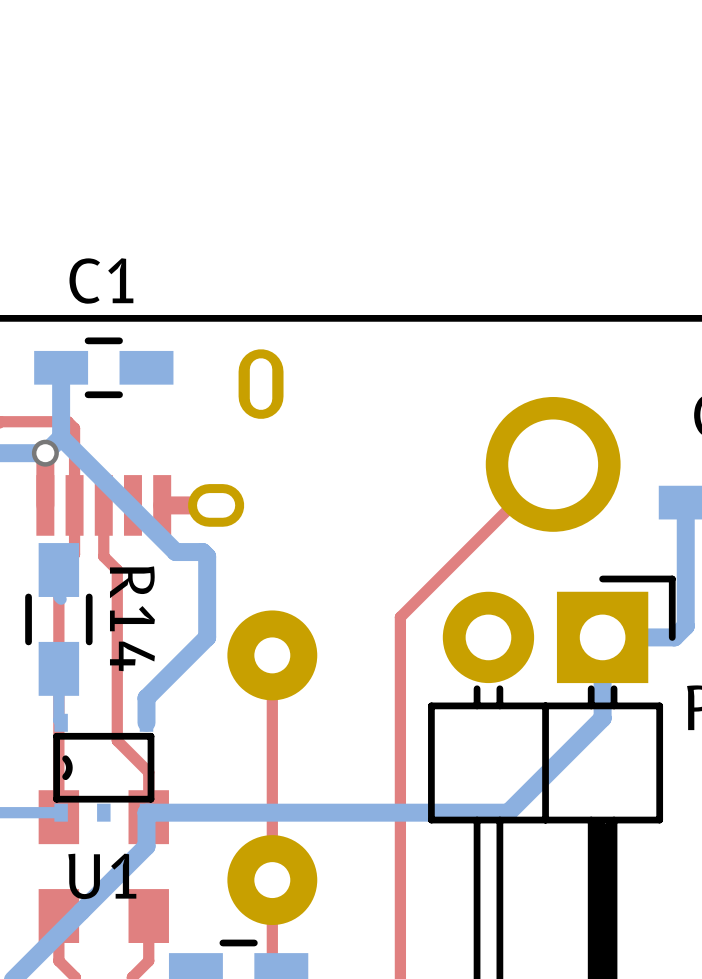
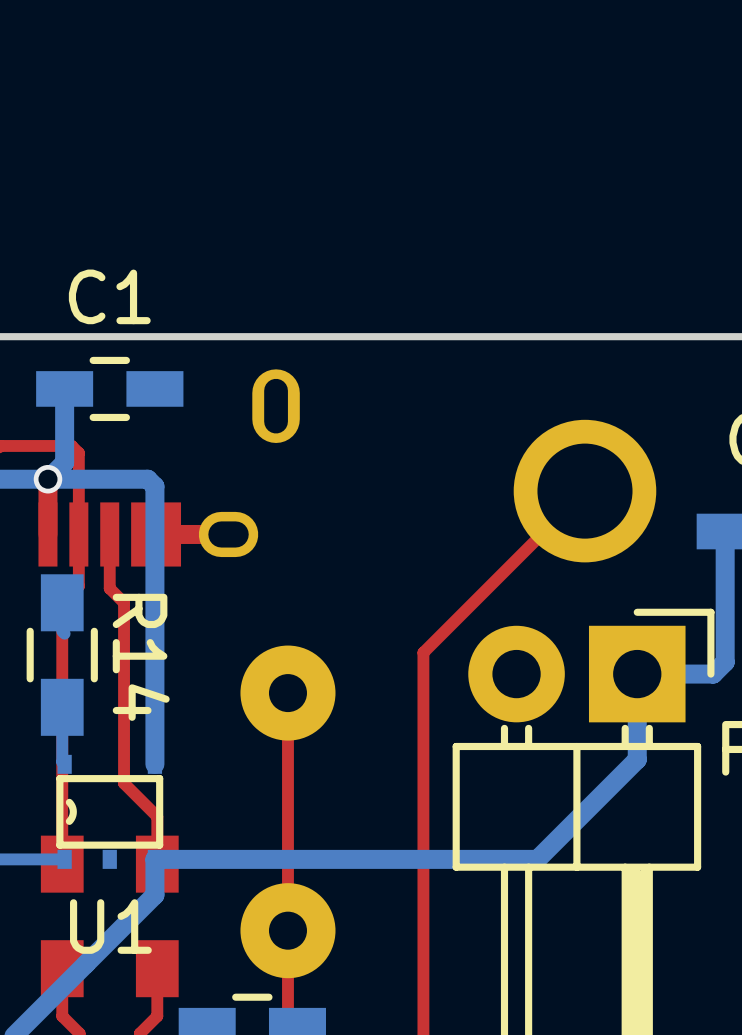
bottom track: (61, 437) (175, 552) (202, 552) (207, 556) (207, 637) (146, 698) -> (48, 479) (147, 479) (154, 486) (154, 738)

